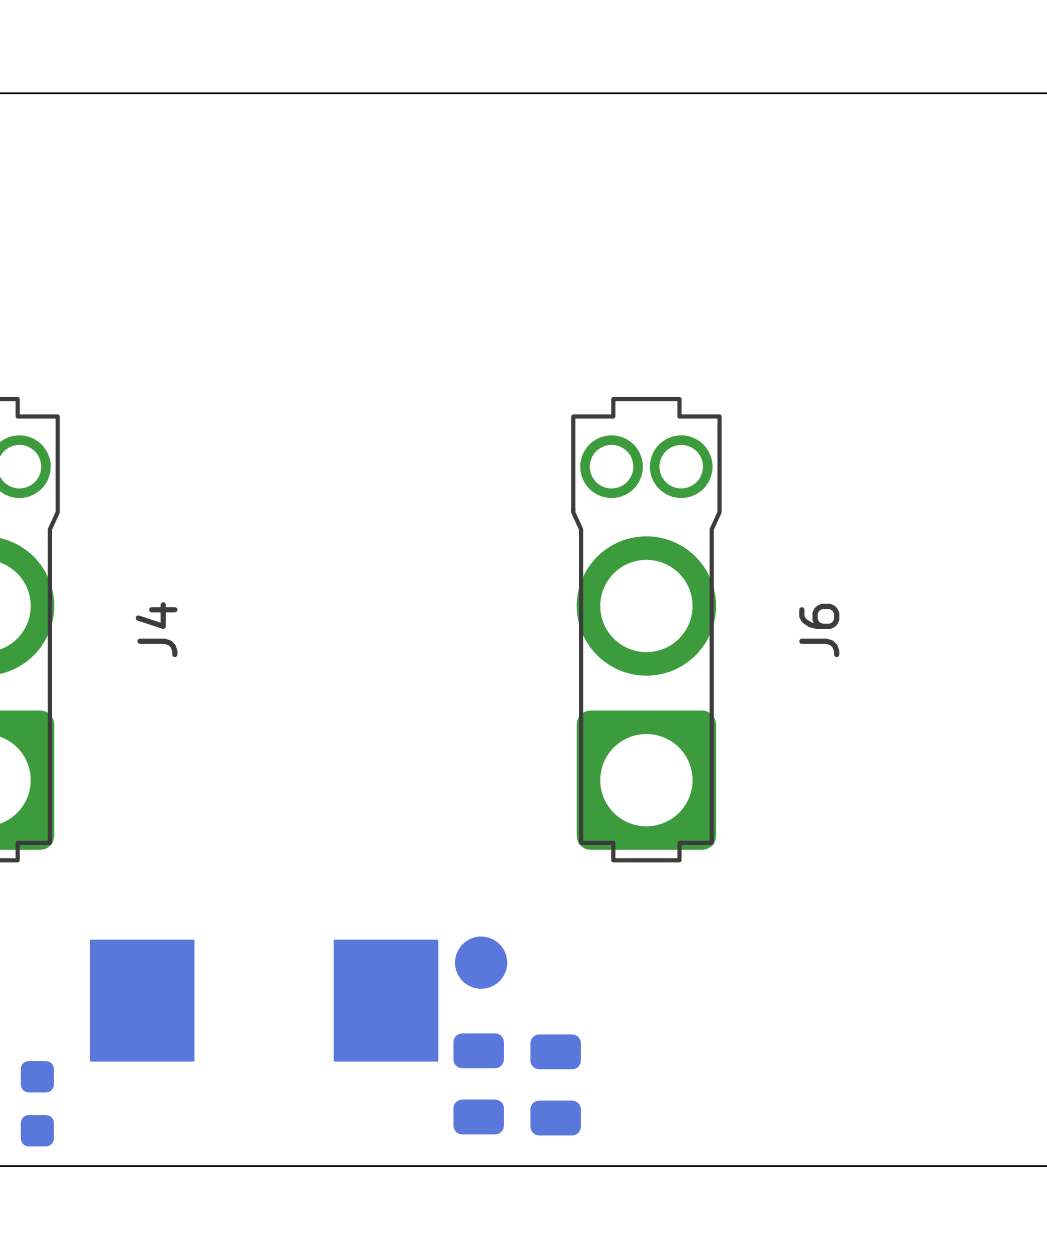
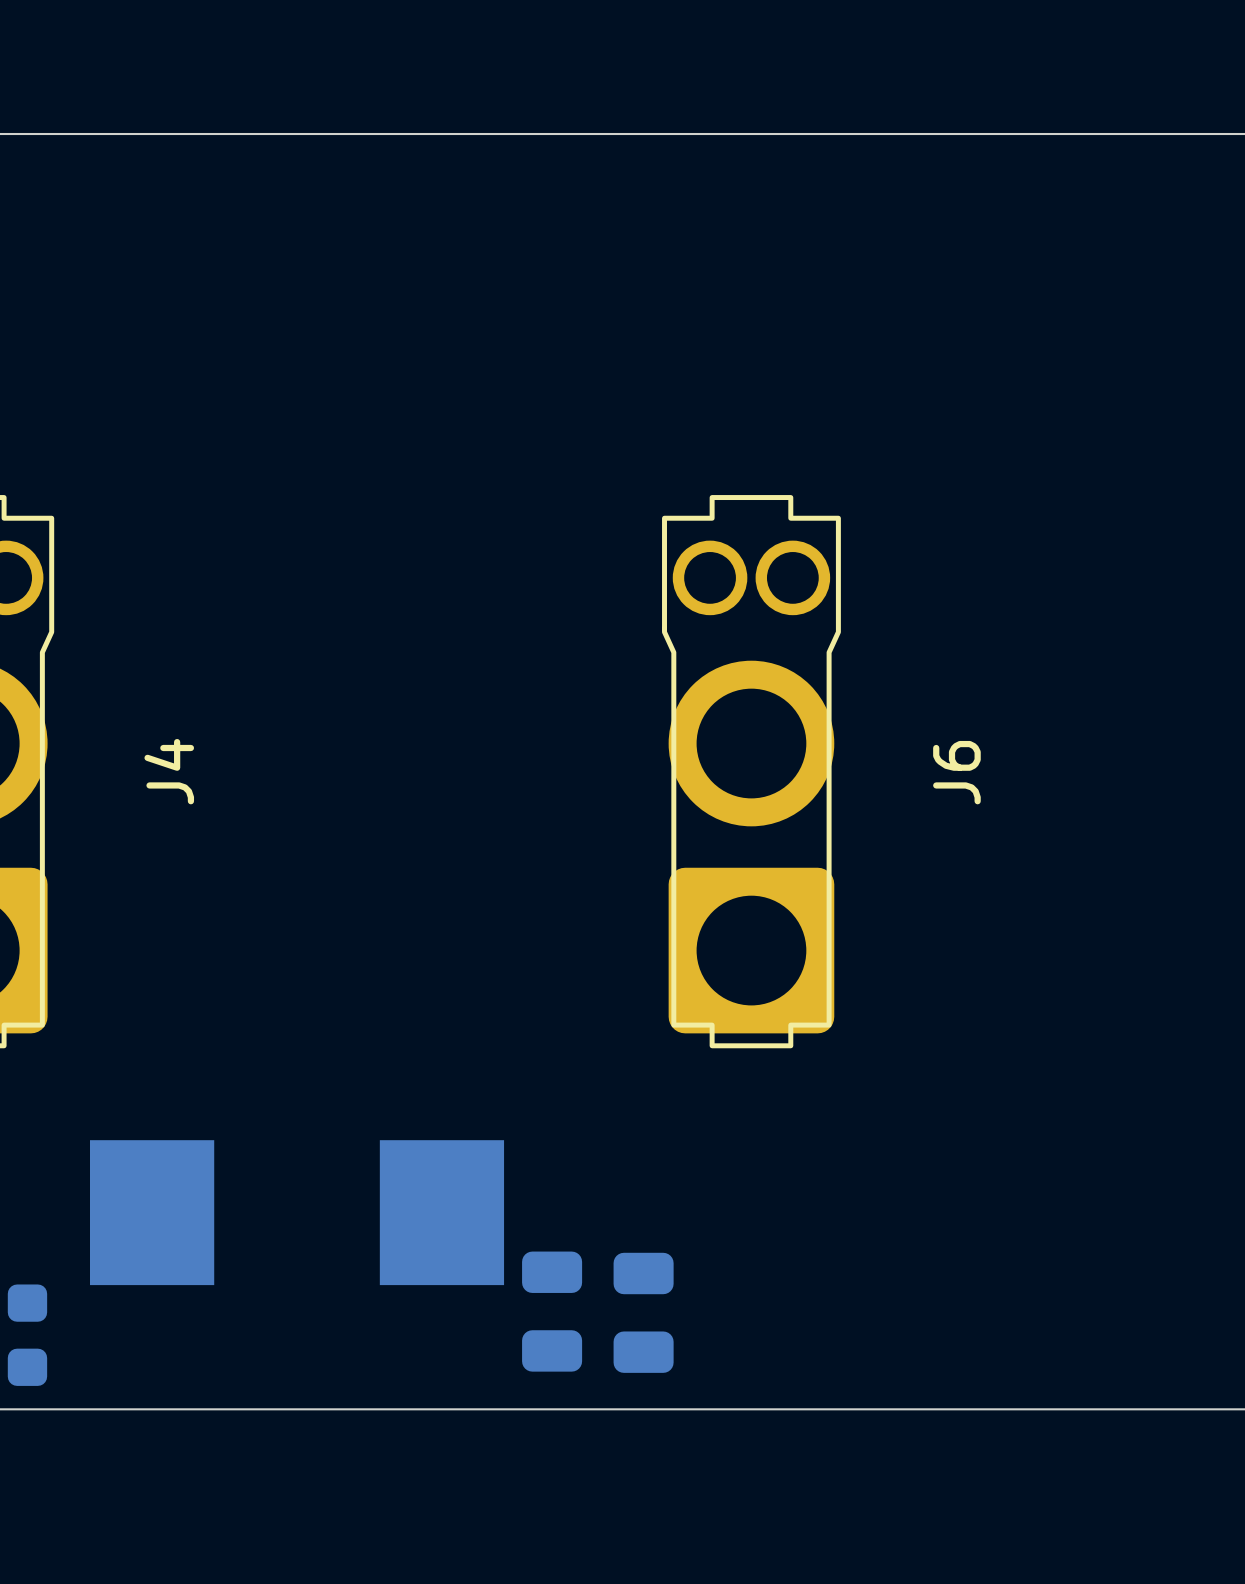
part: (481, 962) -> none

